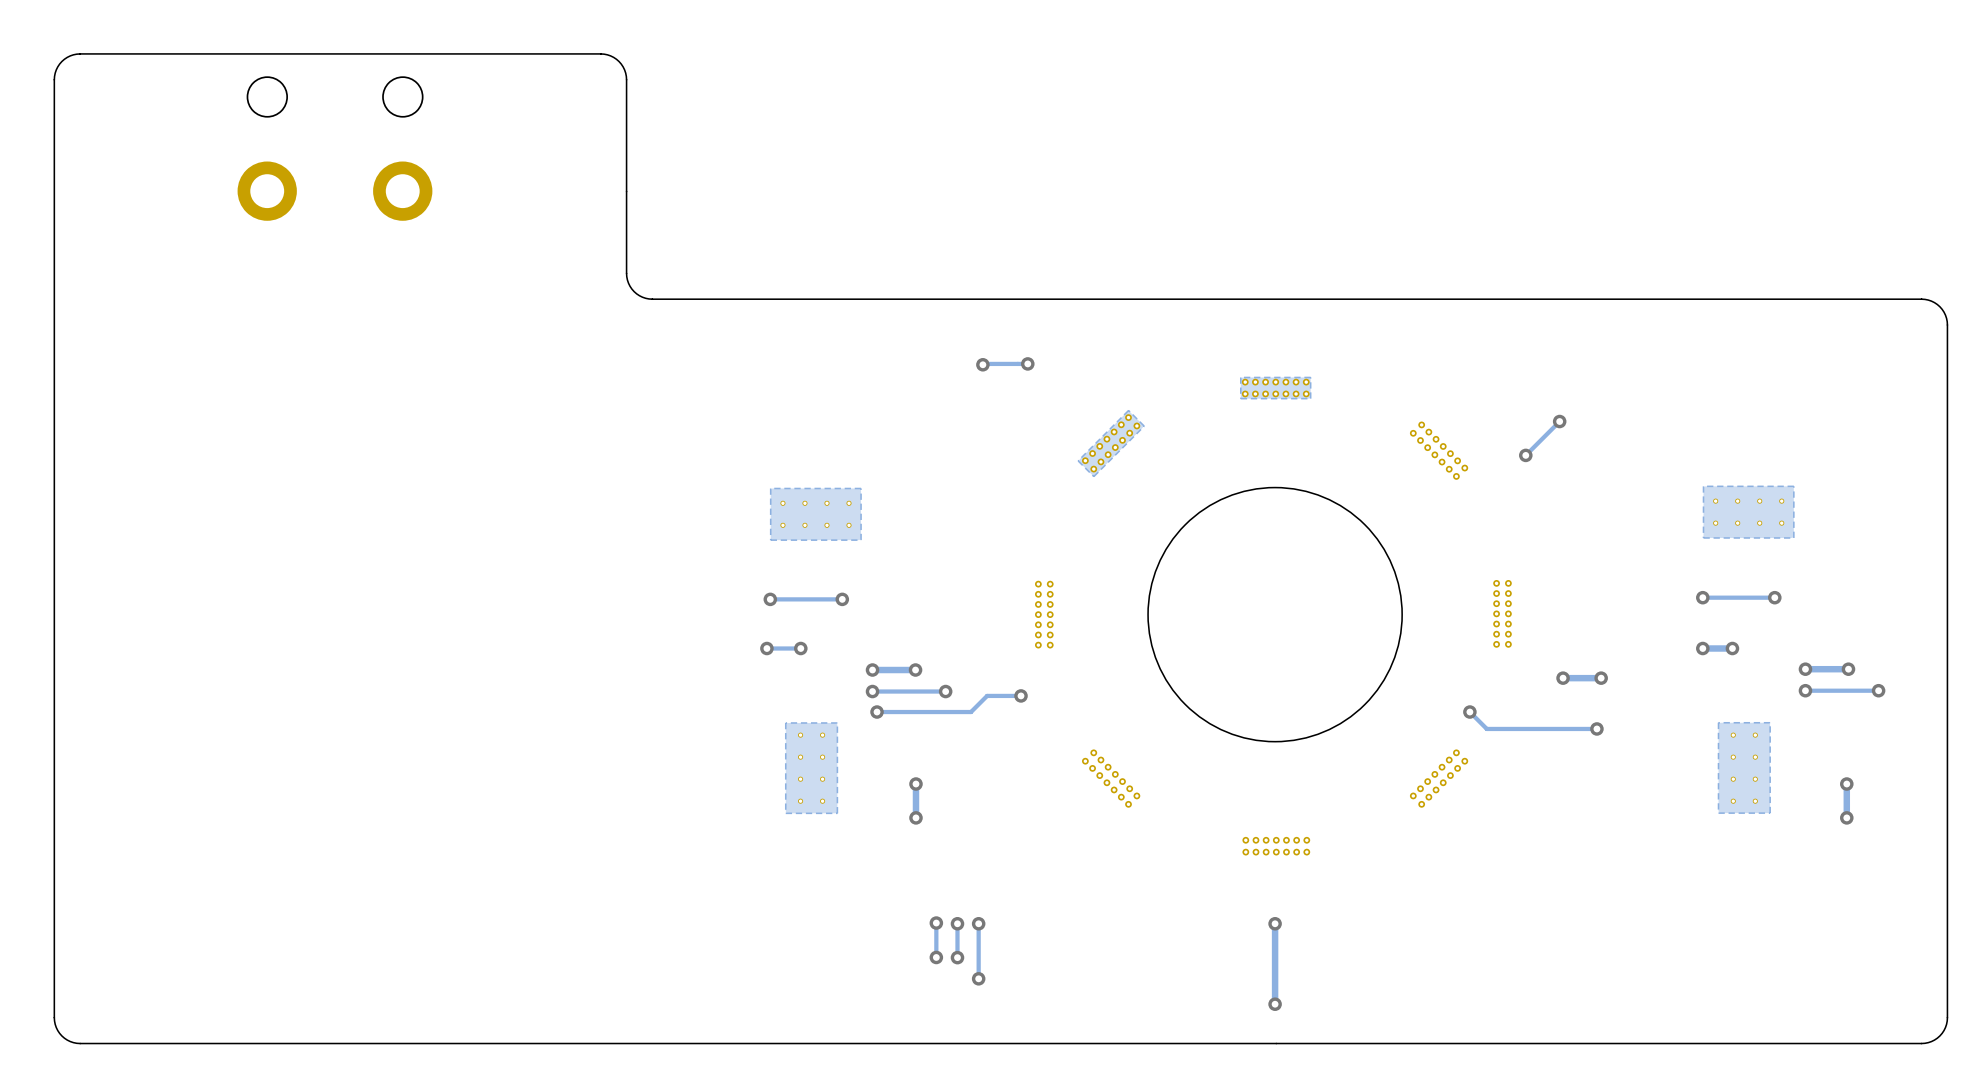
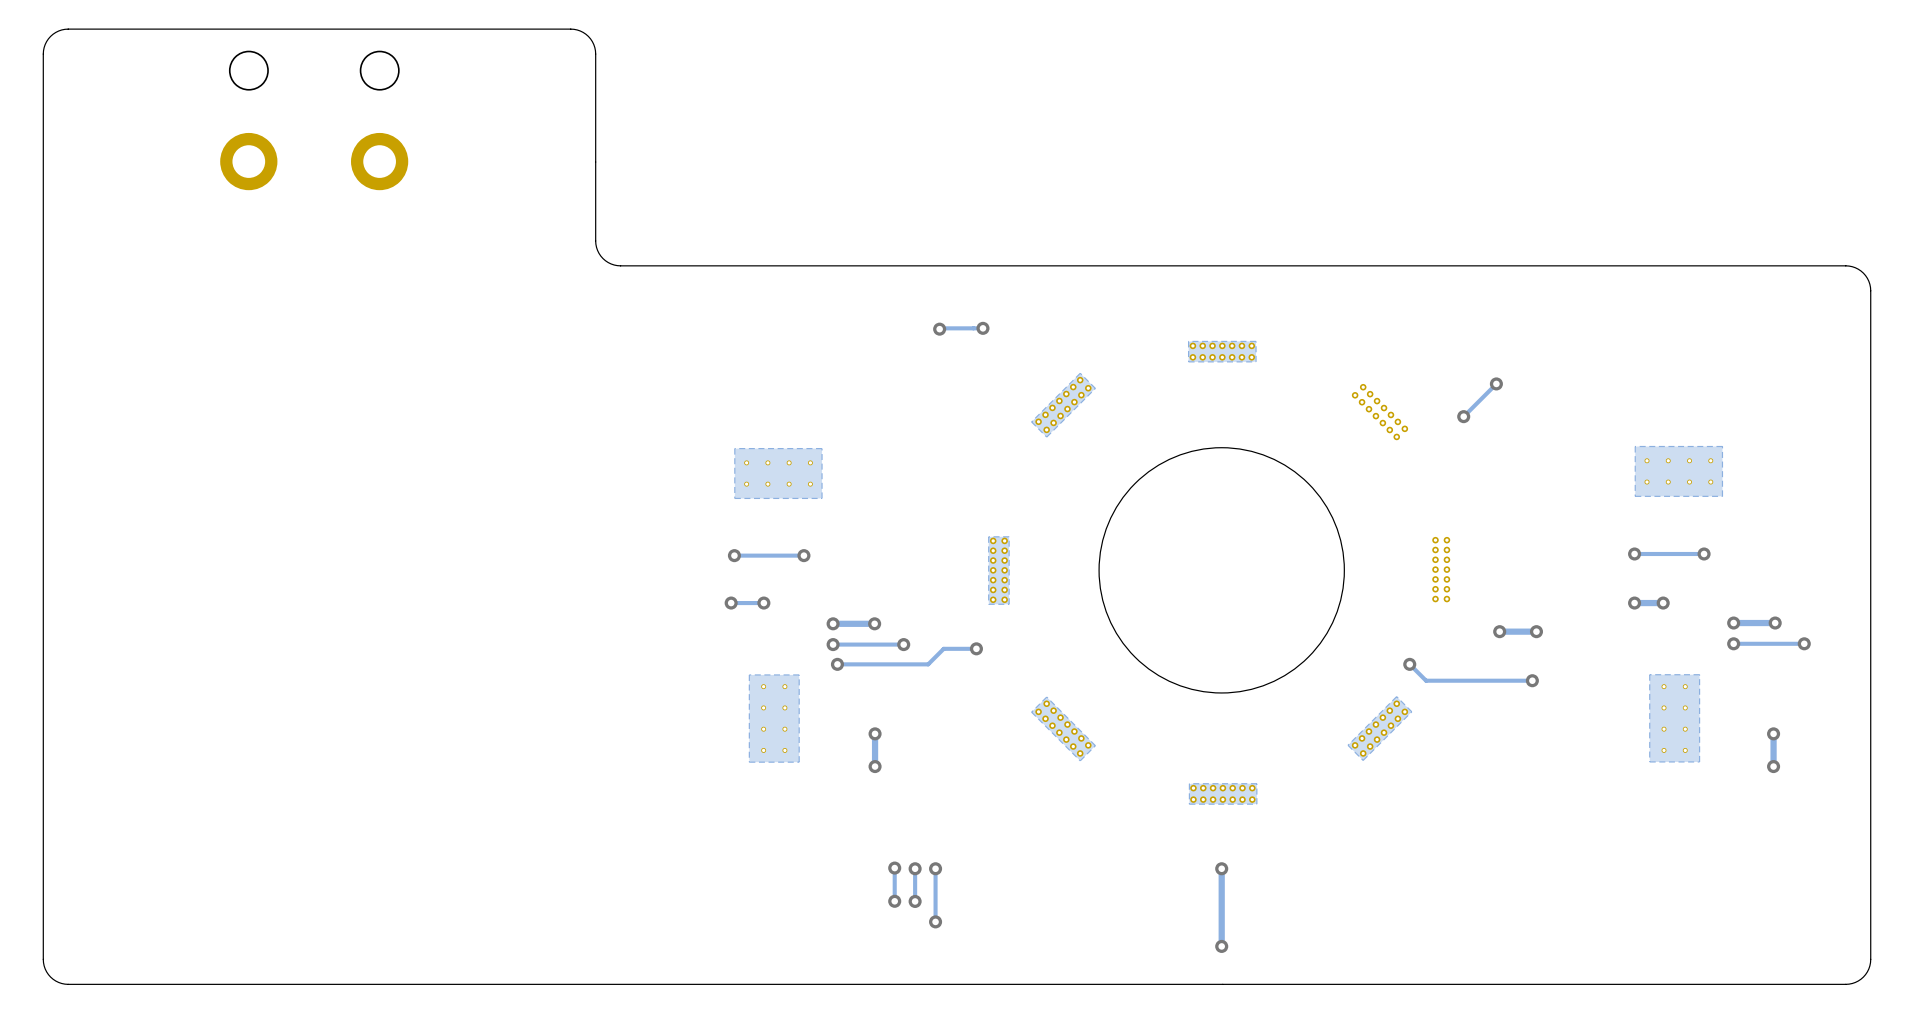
zone outline: none -> (1009, 536) (1009, 604) (988, 604) (988, 536) (1009, 536)
zone outline: none -> (1046, 697) (1031, 712) (1080, 760) (1095, 745) (1046, 697)
zone outline: none -> (1396, 696) (1411, 711) (1363, 760) (1348, 745) (1396, 696)
zone outline: none -> (1256, 783) (1256, 804) (1189, 804) (1189, 783) (1256, 783)

